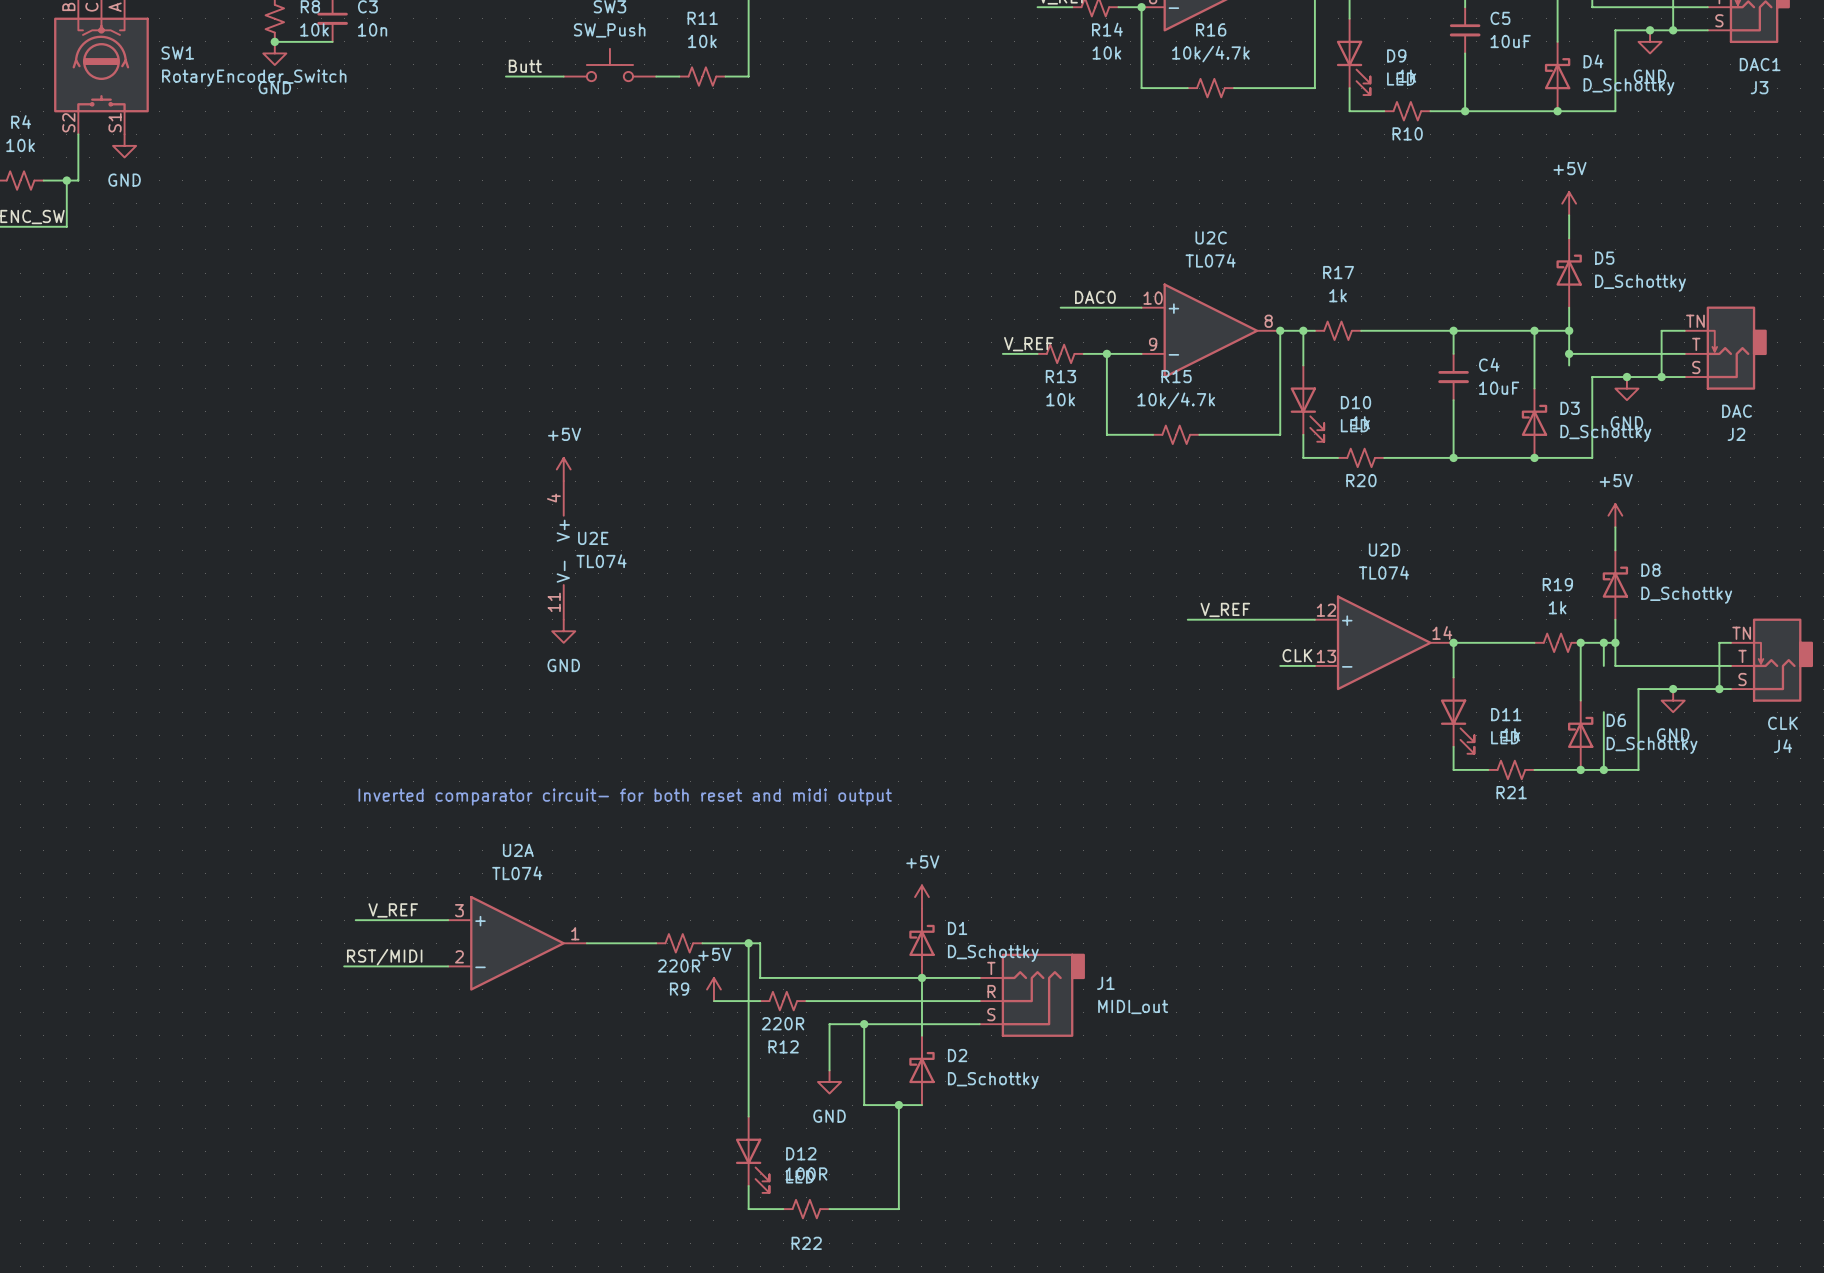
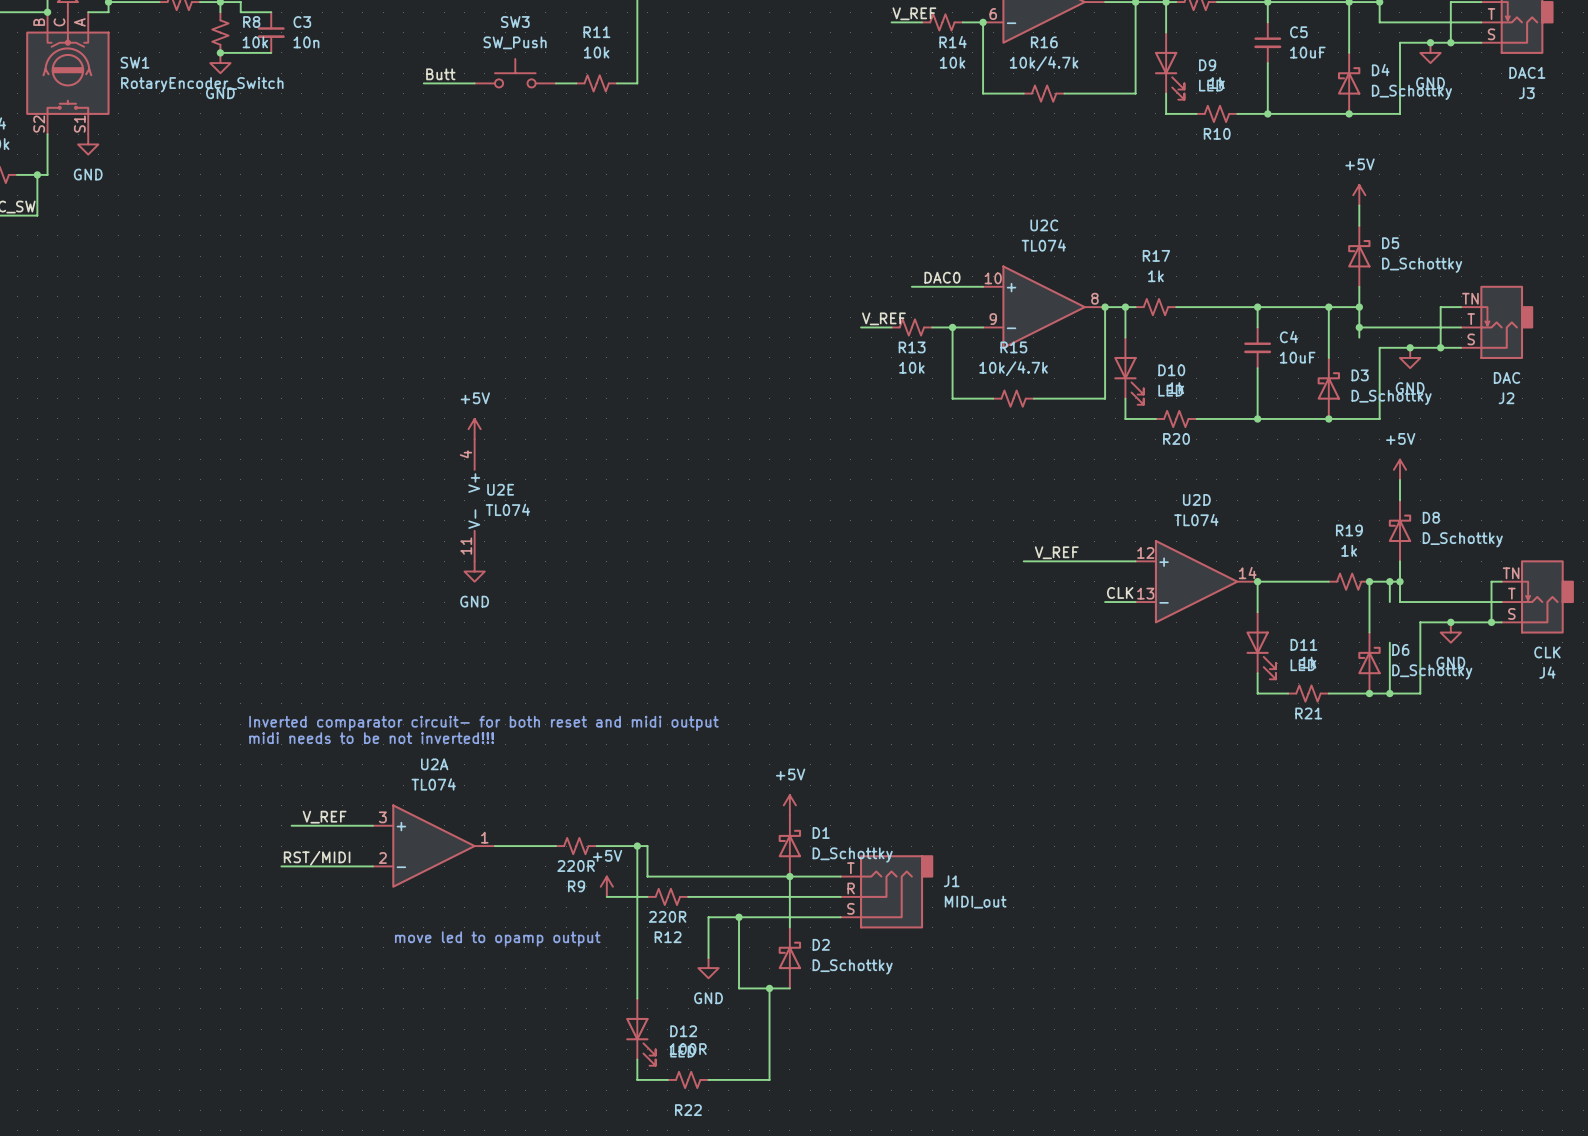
text position: Inverted comparator circuit- for both reset and midi output (625, 797) -> Inverted comparator circuit- for both reset and midi output (483, 723)
text: none -> midi needs to be not inverted!!! (371, 738)
text: none -> move led to opamp output (497, 938)

